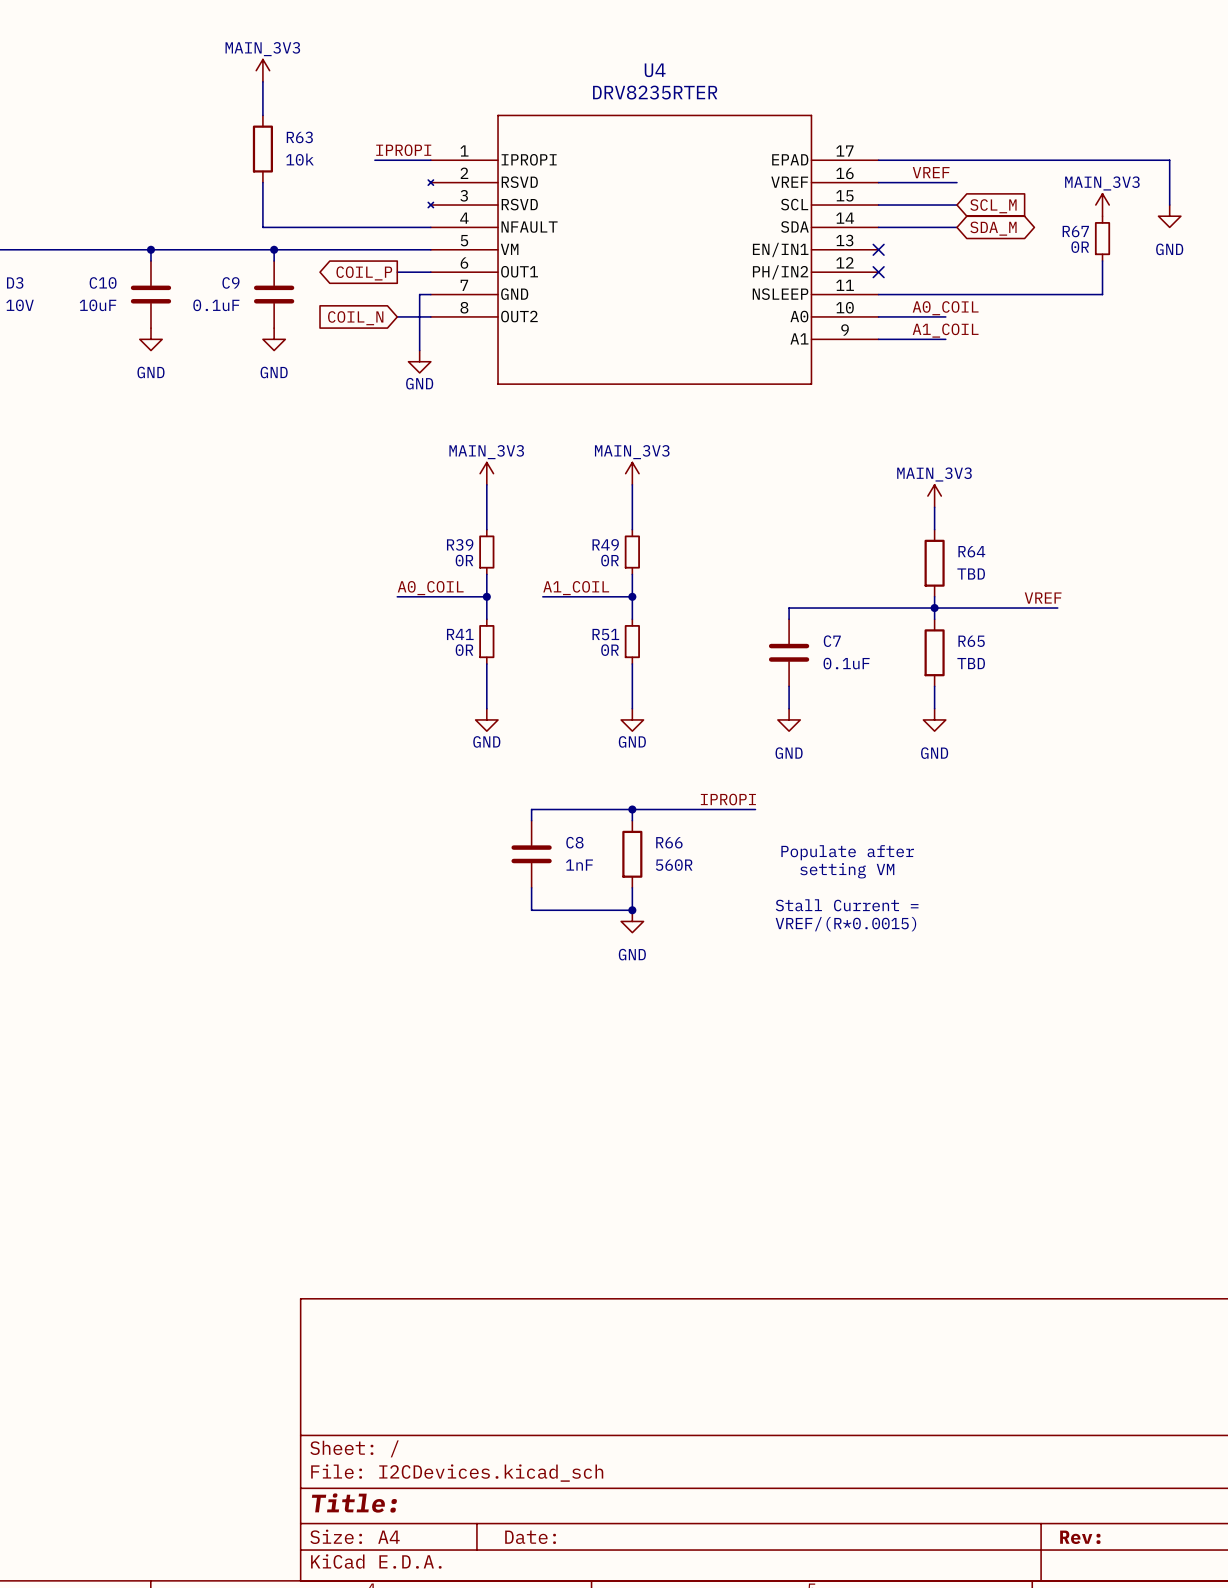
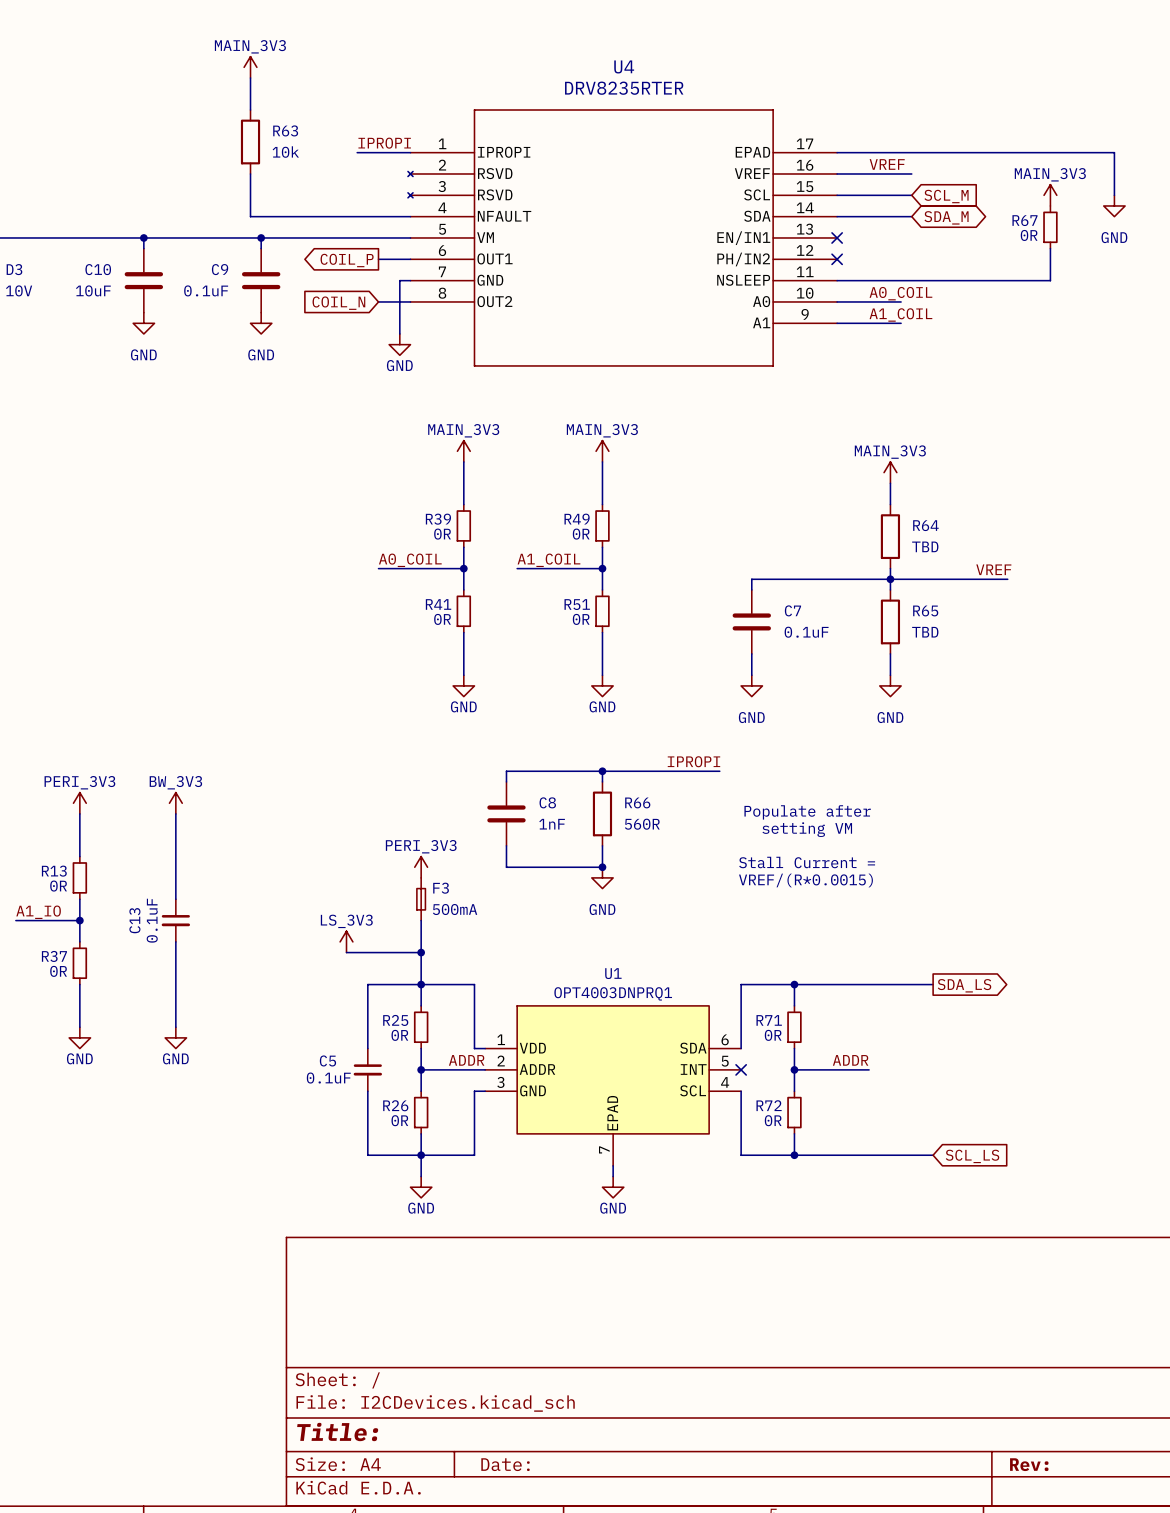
power symbol: none -> PERI_3V3 (79, 803)
power symbol: none -> BW_3V3 (175, 803)
wire: none -> (79, 813) (79, 856)
wire: none -> (175, 813) (175, 899)
power symbol: none -> PERI_3V3 (421, 867)
R13: none -> 0R (79, 877)
wire: none -> (79, 899) (79, 941)
F3: none -> 500mA (421, 899)
label: none -> A1_IO (38, 912)
wire: none -> (15, 920) (79, 920)
junction: none -> (79, 920)
C13: none -> 0.1uF (175, 920)
wire: none -> (421, 920) (421, 1005)
wire: none -> (175, 941) (175, 1027)
power symbol: none -> LS_3V3 (346, 941)
wire: none -> (346, 952) (421, 952)
junction: none -> (421, 952)
R37: none -> 0R (79, 963)
wire: none -> (79, 984) (79, 1027)
junction: none -> (421, 984)
wire: none -> (794, 984) (794, 1005)
junction: none -> (794, 984)
wire: none -> (933, 984) (741, 984) (741, 1048)
global label: none -> SDA_LS (964, 985)
R25: none -> 0R (421, 1027)
R71: none -> 0R (794, 1027)
power symbol: none -> GND (79, 1037)
power symbol: none -> GND (175, 1037)
wire: none -> (367, 1048) (367, 984) (474, 984) (474, 1048) (485, 1048)
wire: none -> (421, 1048) (421, 1091)
wire: none -> (794, 1048) (794, 1091)
label: none -> ADDR (466, 1060)
label: none -> ADDR (850, 1060)
C5: none -> 0.1uF (367, 1069)
wire: none -> (421, 1069) (485, 1069)
junction: none -> (421, 1069)
no-connect mark: none -> (741, 1069)
wire: none -> (794, 1069) (869, 1069)
junction: none -> (794, 1069)
U1: none -> OPT4003DNPRQ1 (613, 1085)
wire: none -> (367, 1091) (367, 1155) (474, 1155) (474, 1091) (485, 1091)
wire: none -> (741, 1091) (741, 1155) (933, 1155)
R26: none -> 0R (421, 1112)
R72: none -> 0R (794, 1112)
wire: none -> (421, 1133) (421, 1176)
wire: none -> (794, 1133) (794, 1155)
junction: none -> (421, 1155)
junction: none -> (794, 1155)
global label: none -> SCL_LS (972, 1156)
wire: none -> (613, 1165) (613, 1176)
power symbol: none -> GND (421, 1187)
power symbol: none -> GND (613, 1187)

